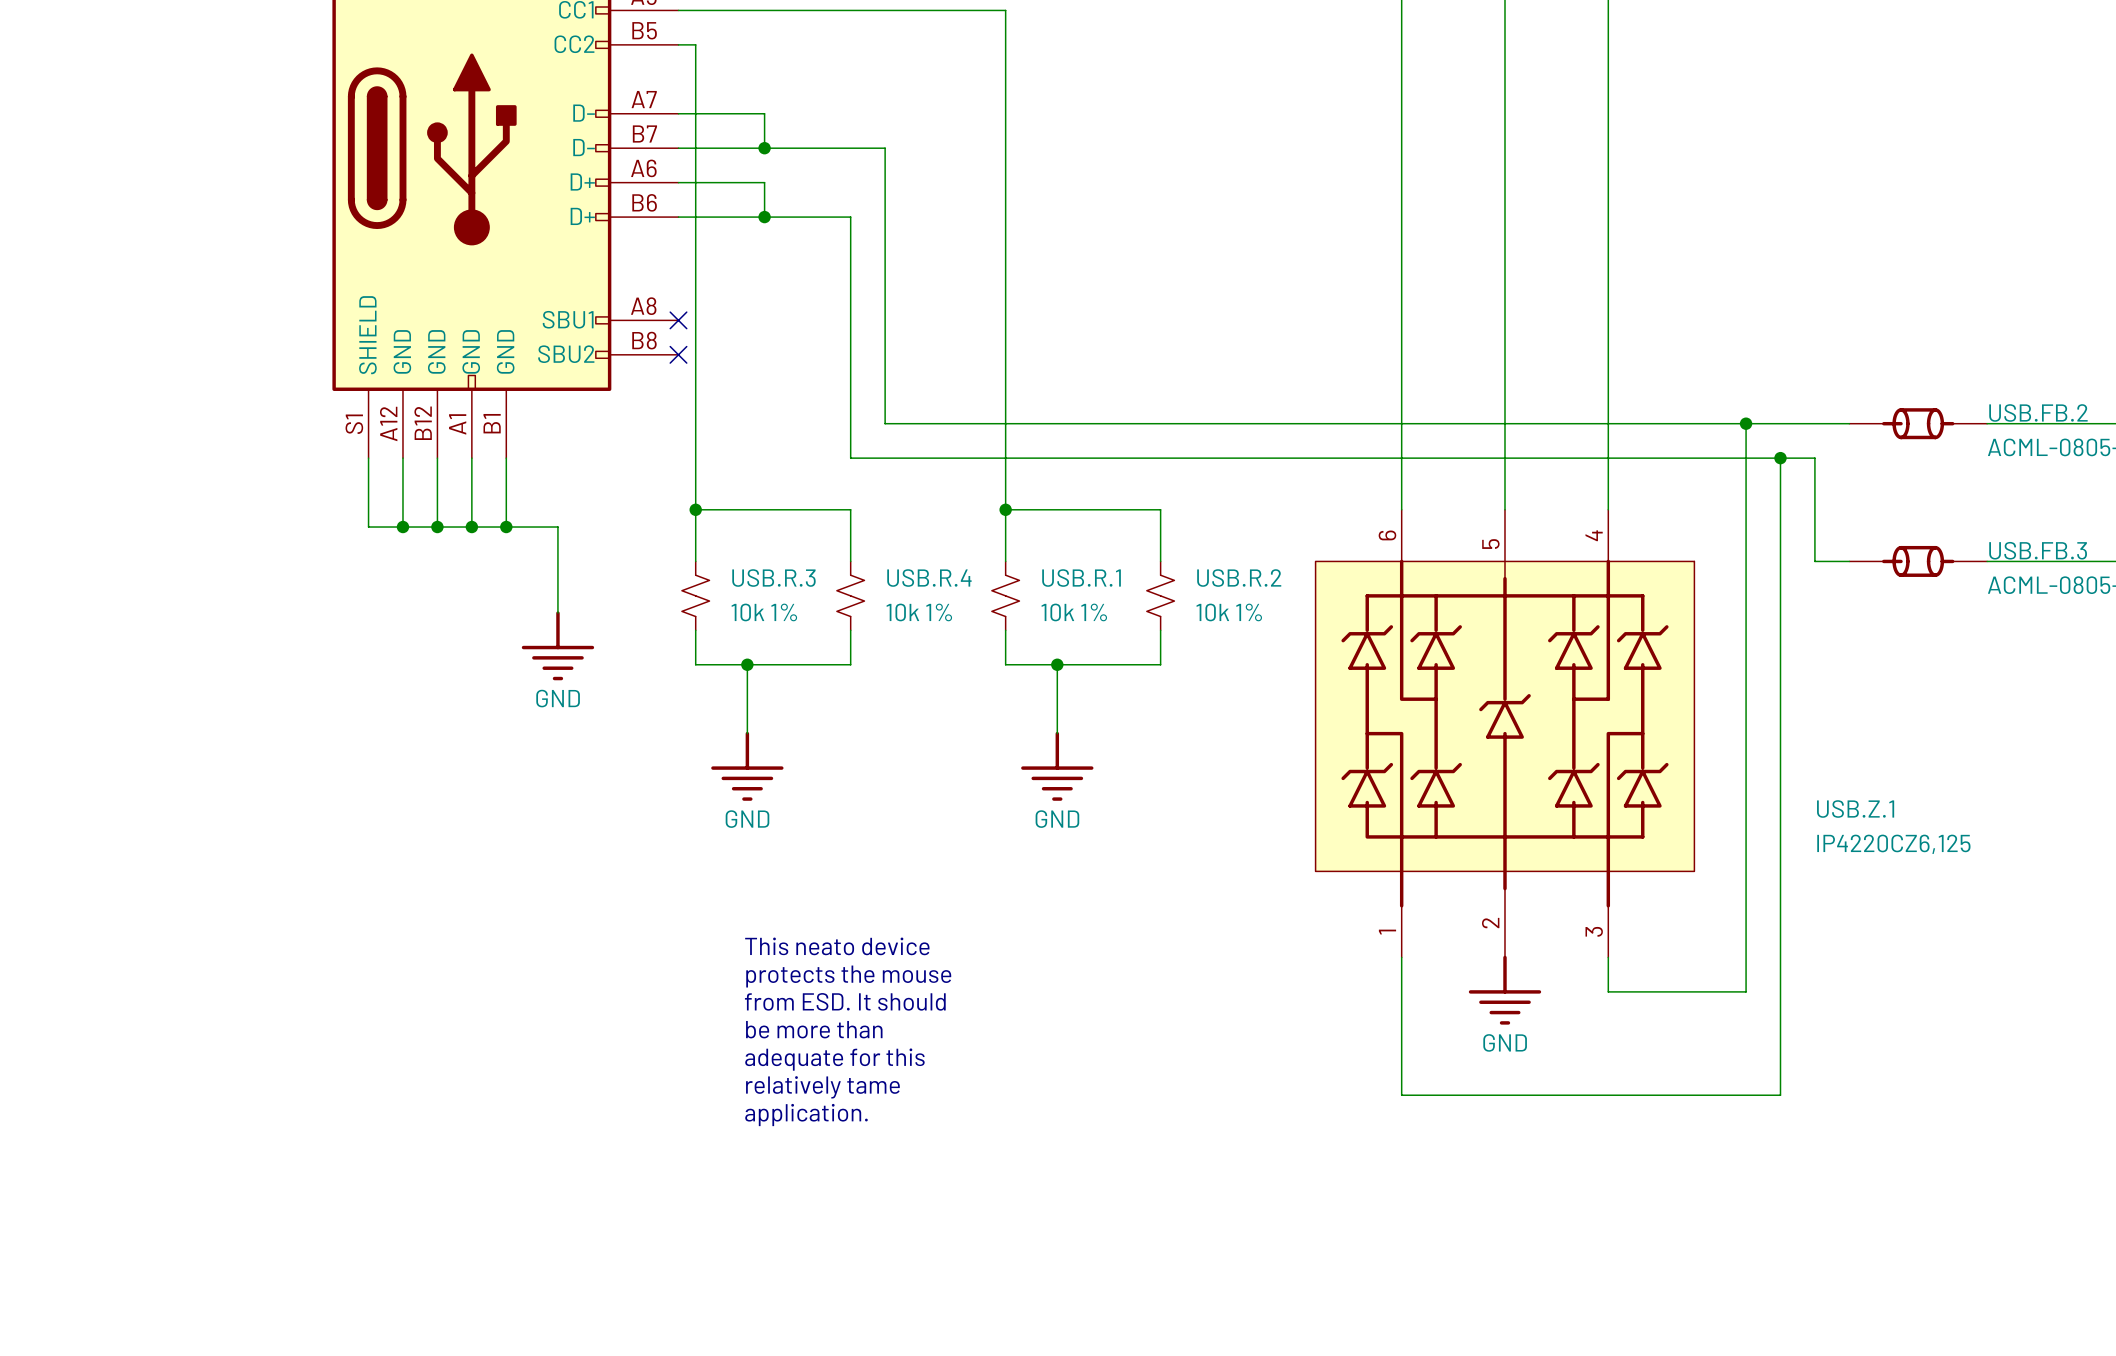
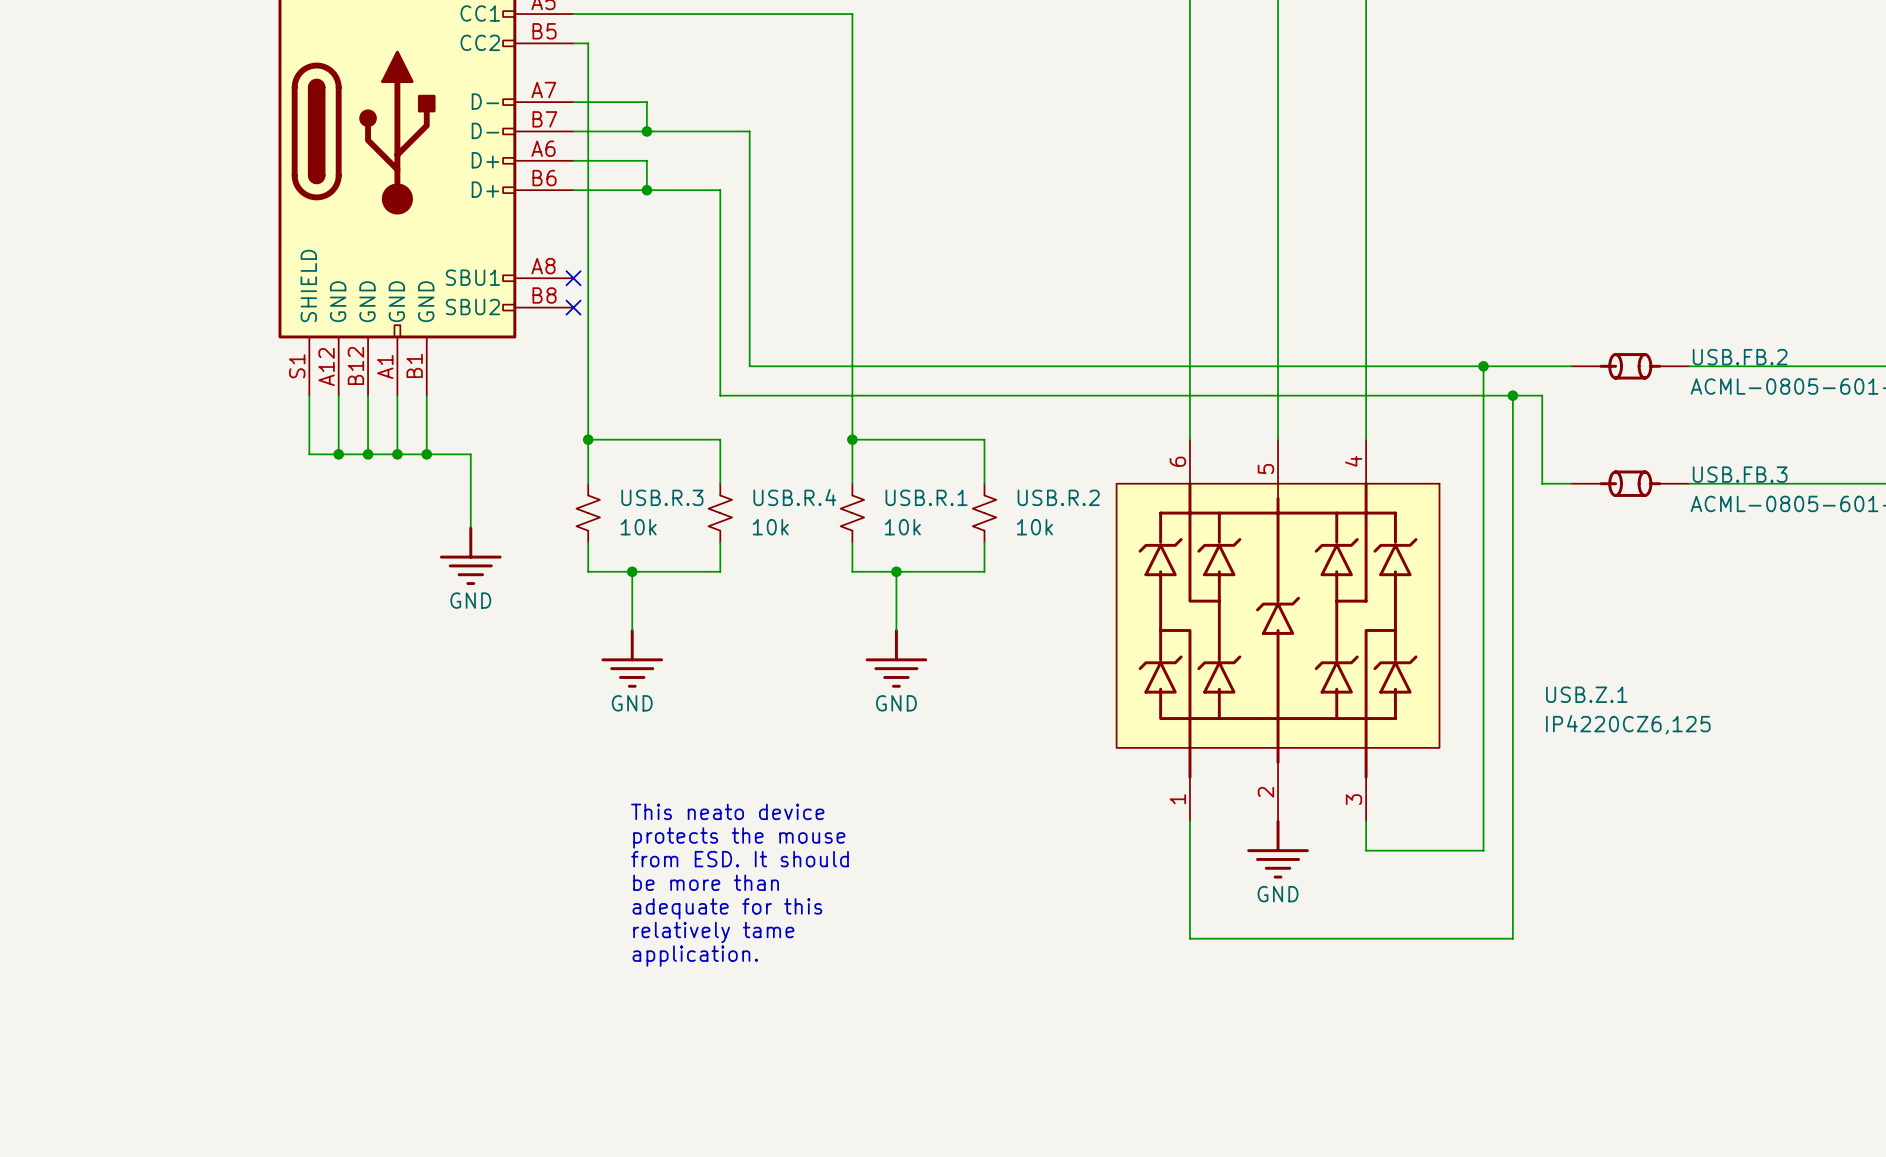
USB.R.3 value: 10k 1% (764, 612) -> 10k (638, 527)
USB.R.4 value: 10k 1% (919, 612) -> 10k (770, 527)
USB.R.1 value: 10k 1% (1074, 612) -> 10k (902, 527)
USB.R.2 value: 10k 1% (1229, 612) -> 10k (1034, 527)

